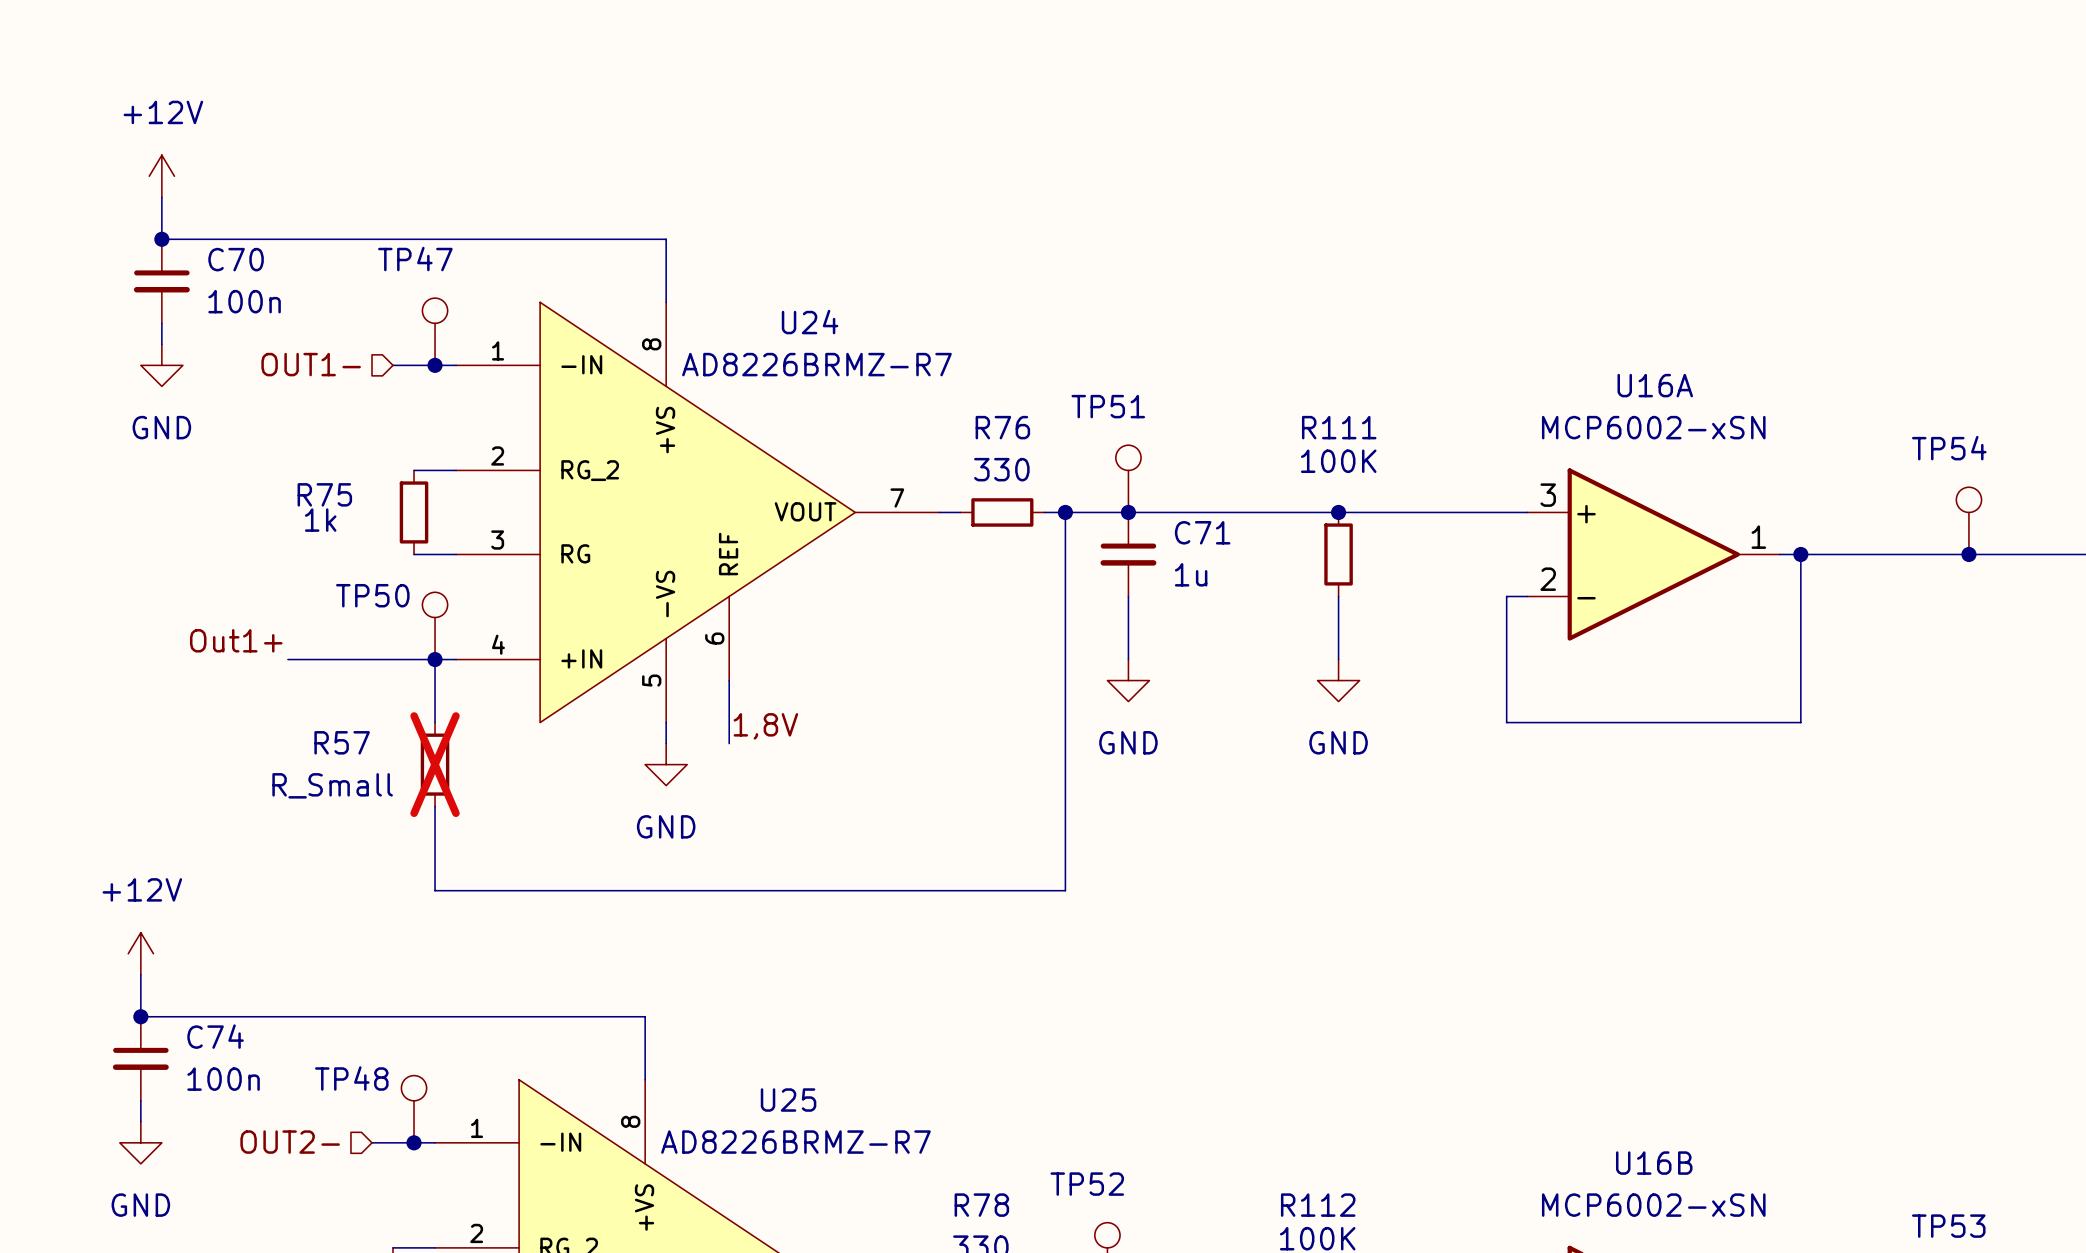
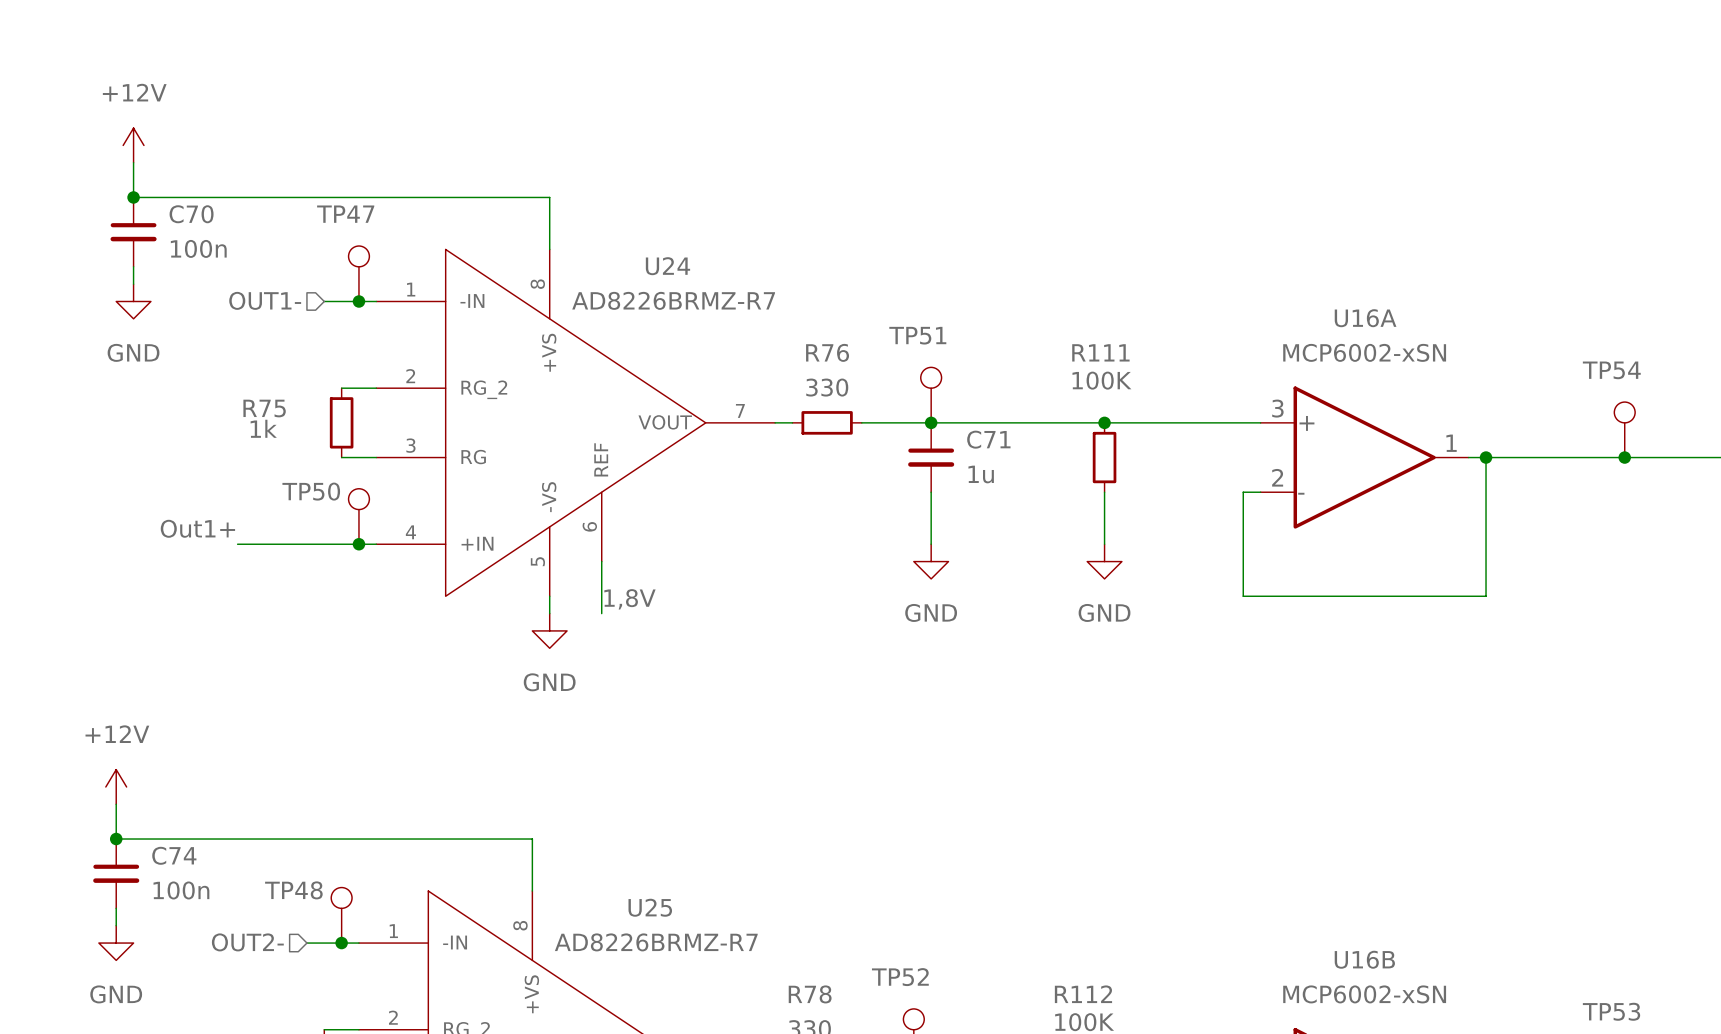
wire: (1065, 512) (1065, 890) (435, 890) (435, 806) -> none
junction: (1065, 512) -> none
wire: (435, 659) (435, 722) -> none
R57: R_Small (435, 764) -> none

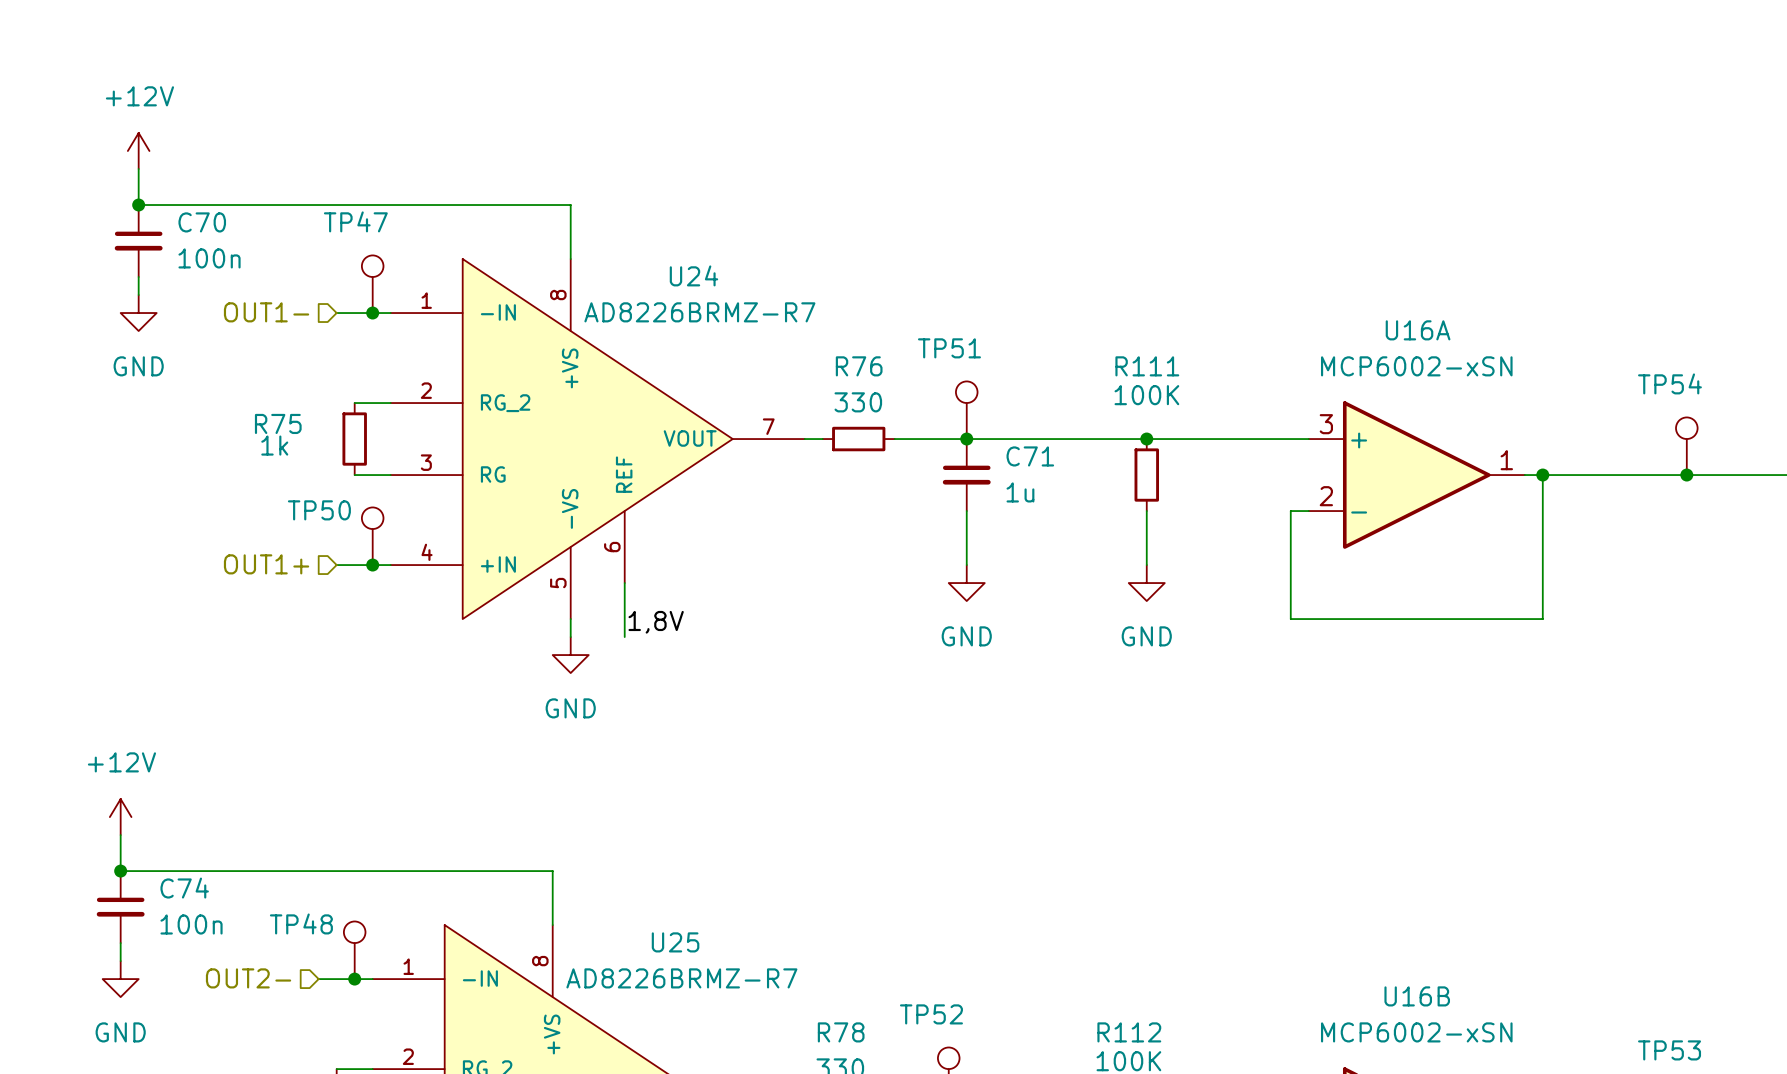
label: Out1+ (197, 528) -> none
hierarchical label: none -> OUT1+ (266, 564)
wire: (237, 544) (324, 544) -> none

